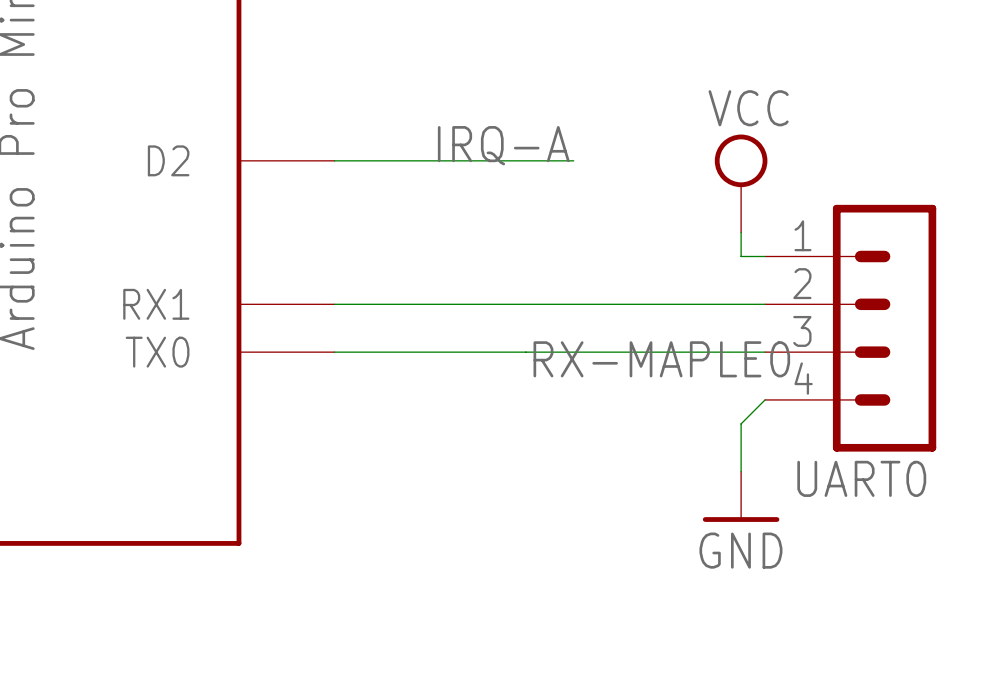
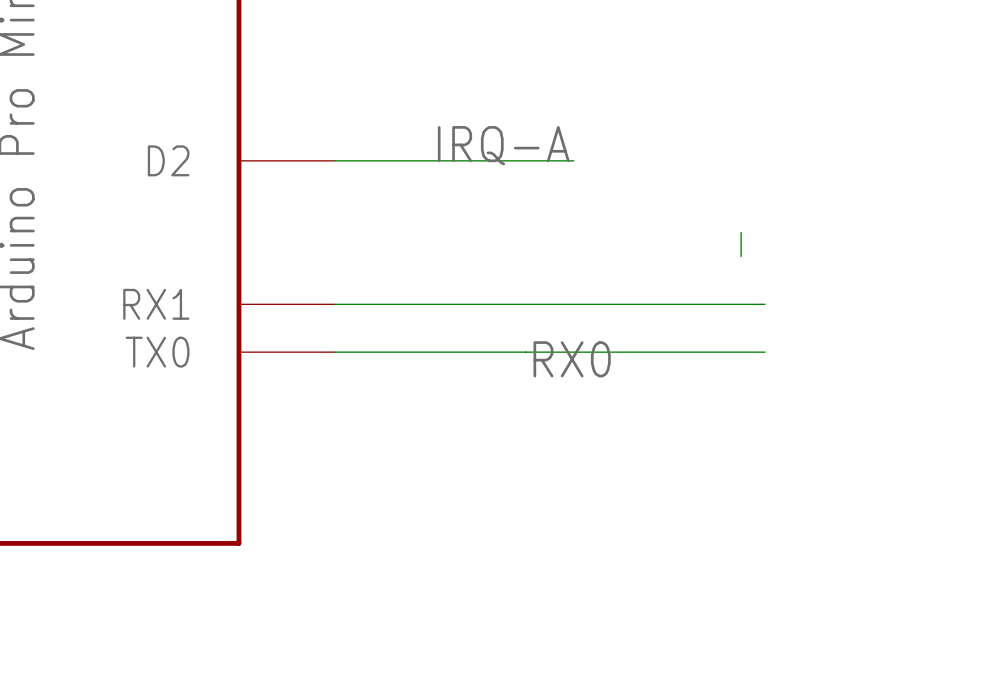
power symbol: VCC (741, 183) -> none
wire: (741, 256) (765, 256) -> none
UART0: (850, 328) -> none
label: RX-MAPLE0 (661, 359) -> RX0 (572, 359)
wire: (765, 399) (741, 423) (741, 471) -> none
power symbol: GND (741, 496) -> none

